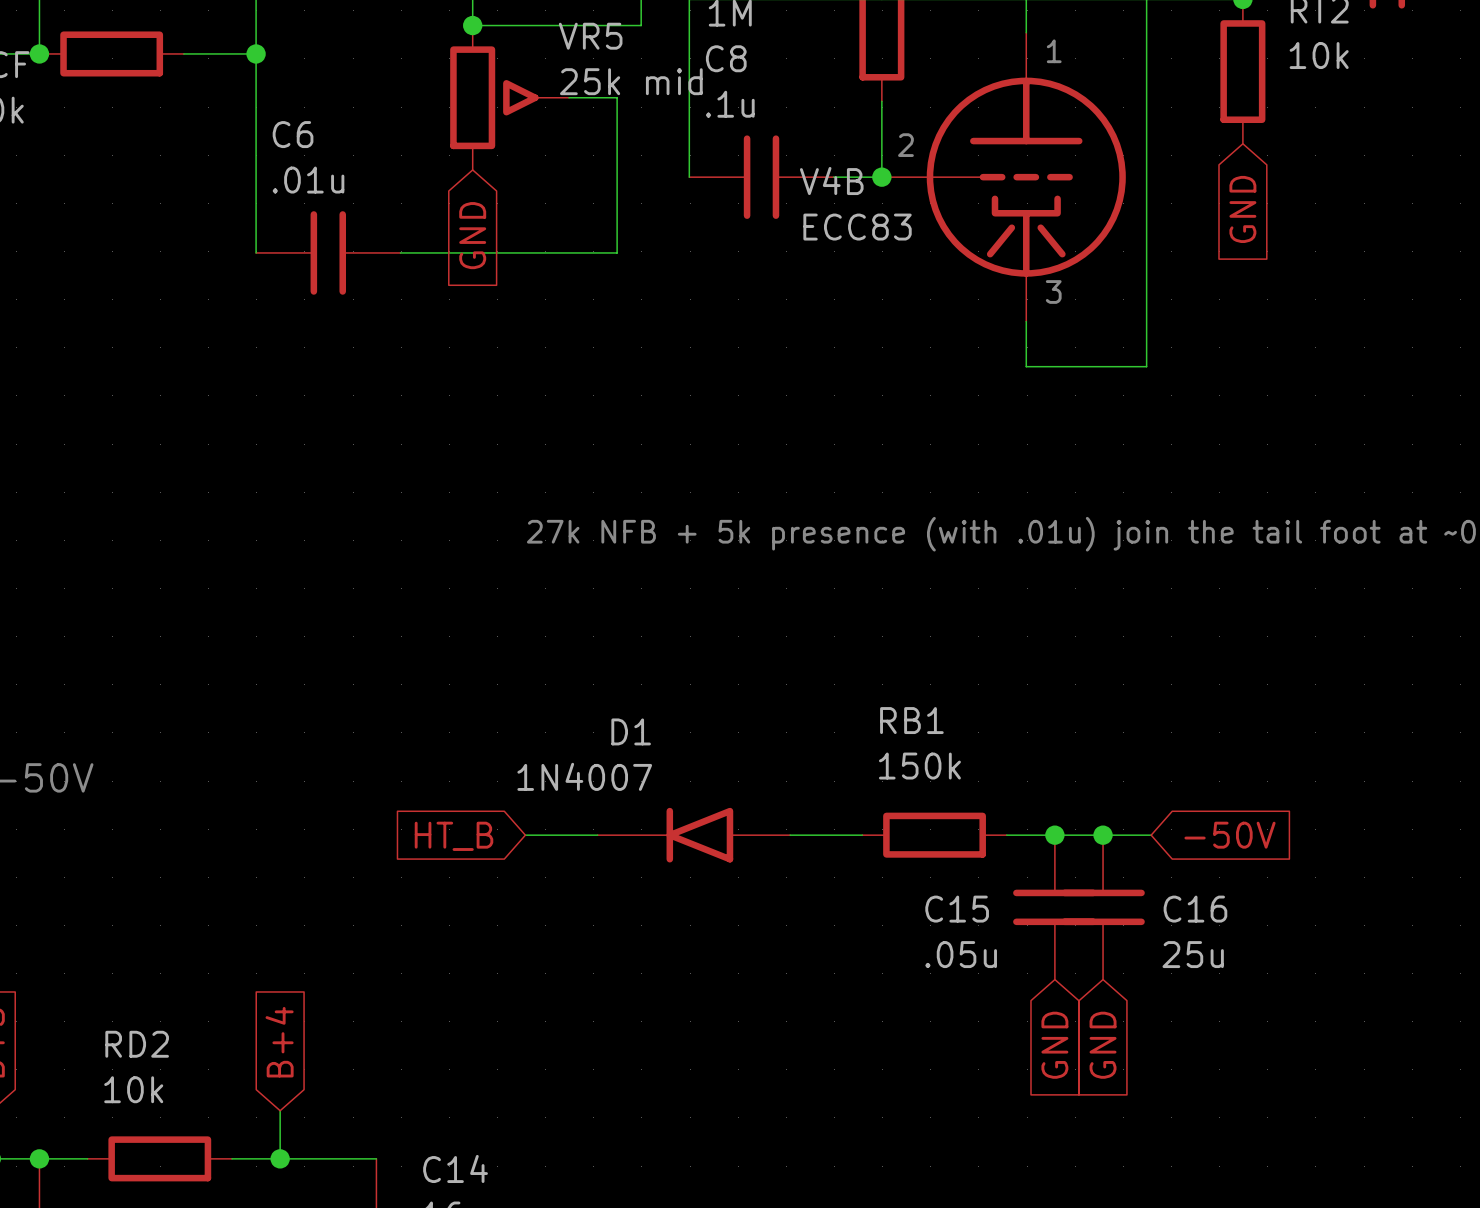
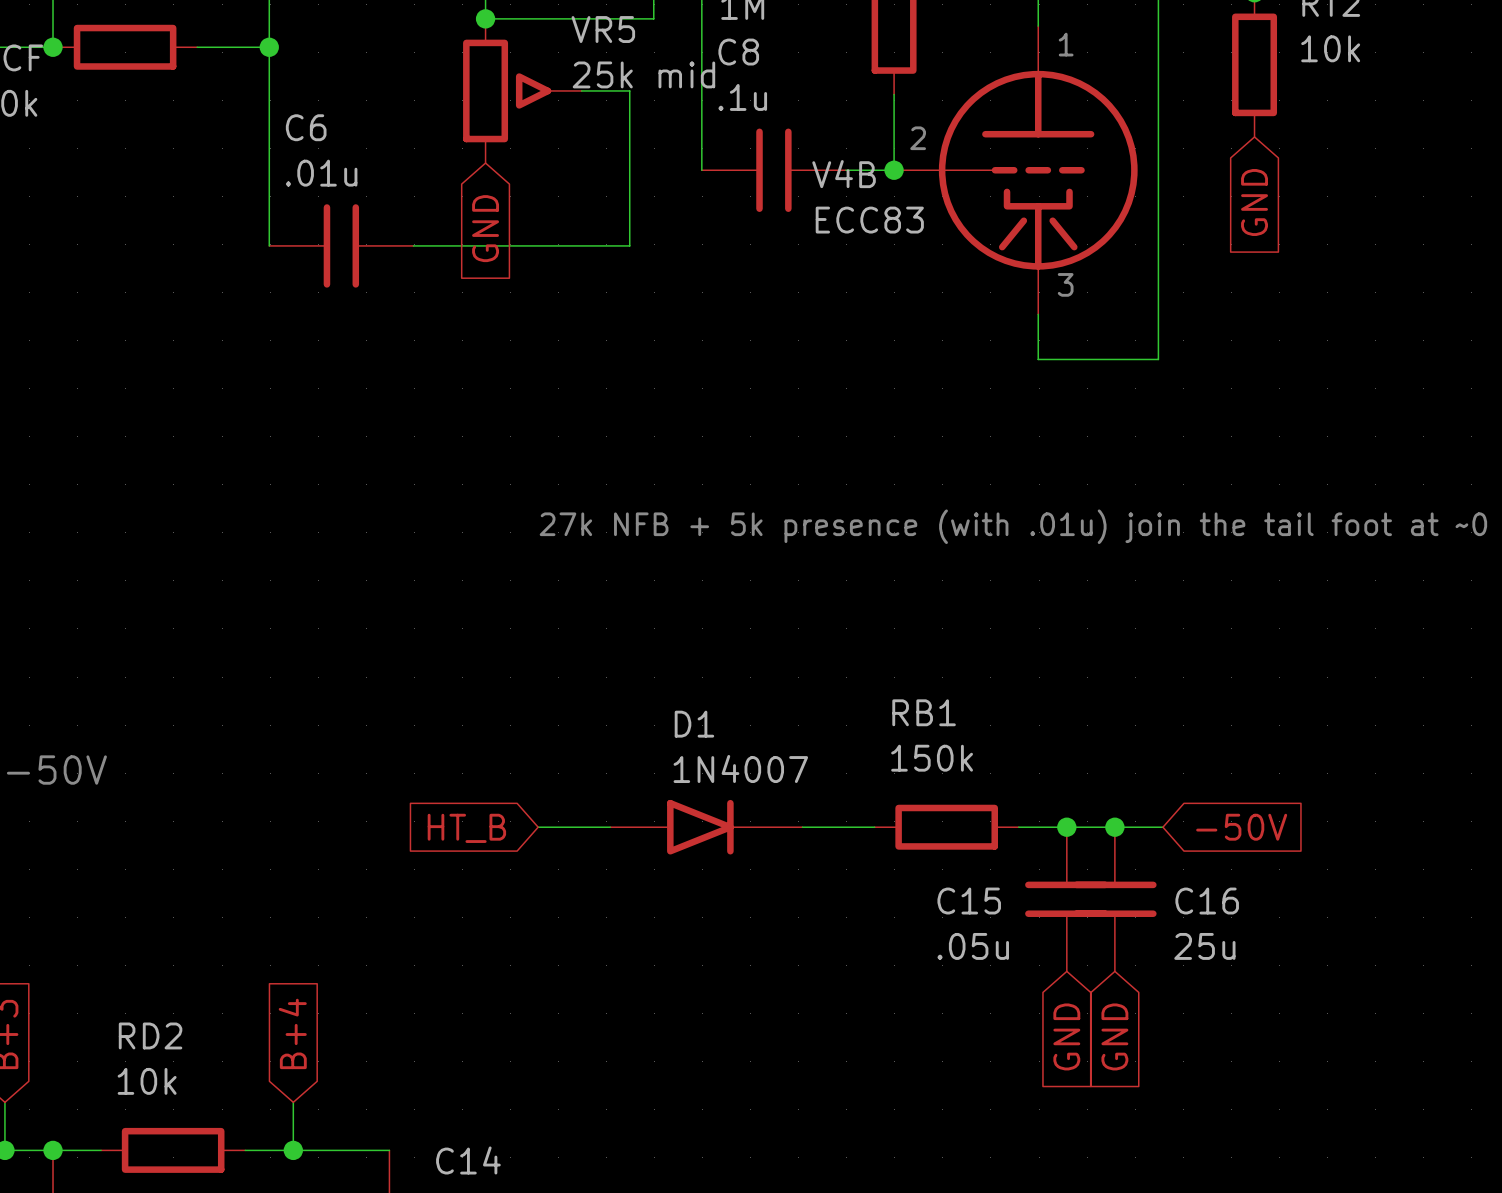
D1 name position: D1 (631, 731) -> D1 (694, 724)
D1 value position: 1N4007 (584, 776) -> 1N4007 (740, 768)
D1 rotation: 0° (699, 835) -> 180° (700, 827)

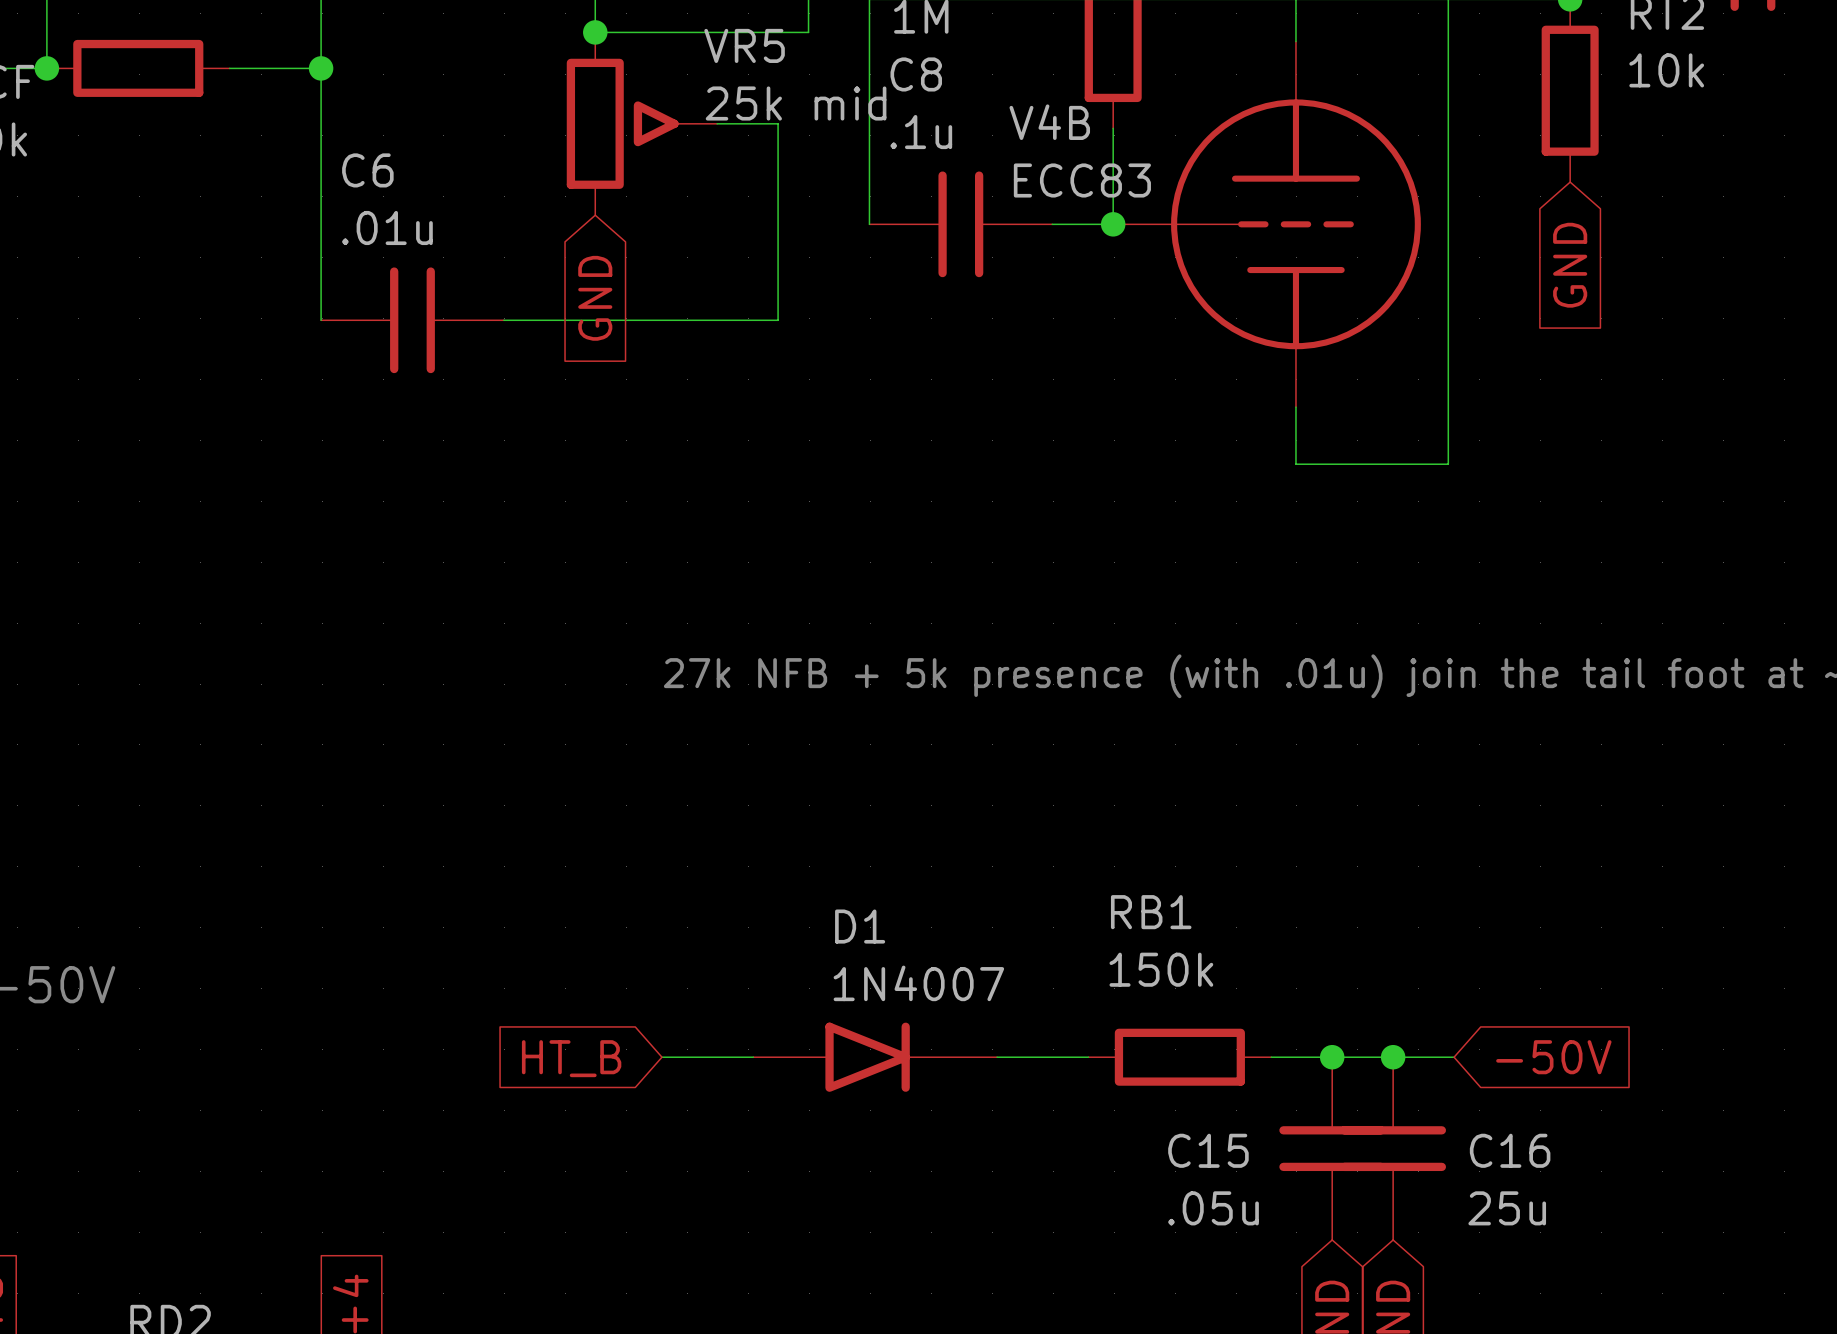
V4B symbol: [894, 26, 1138, 315] -> [1113, 41, 1421, 408]
text: 1 (1066, 44) -> none
text: 2 (918, 138) -> none
V4B name position: V4B (844, 174) -> V4B (1049, 122)
V4B value position: ECC83 (869, 220) -> ECC83 (1082, 180)
text: 3 (1065, 284) -> none

